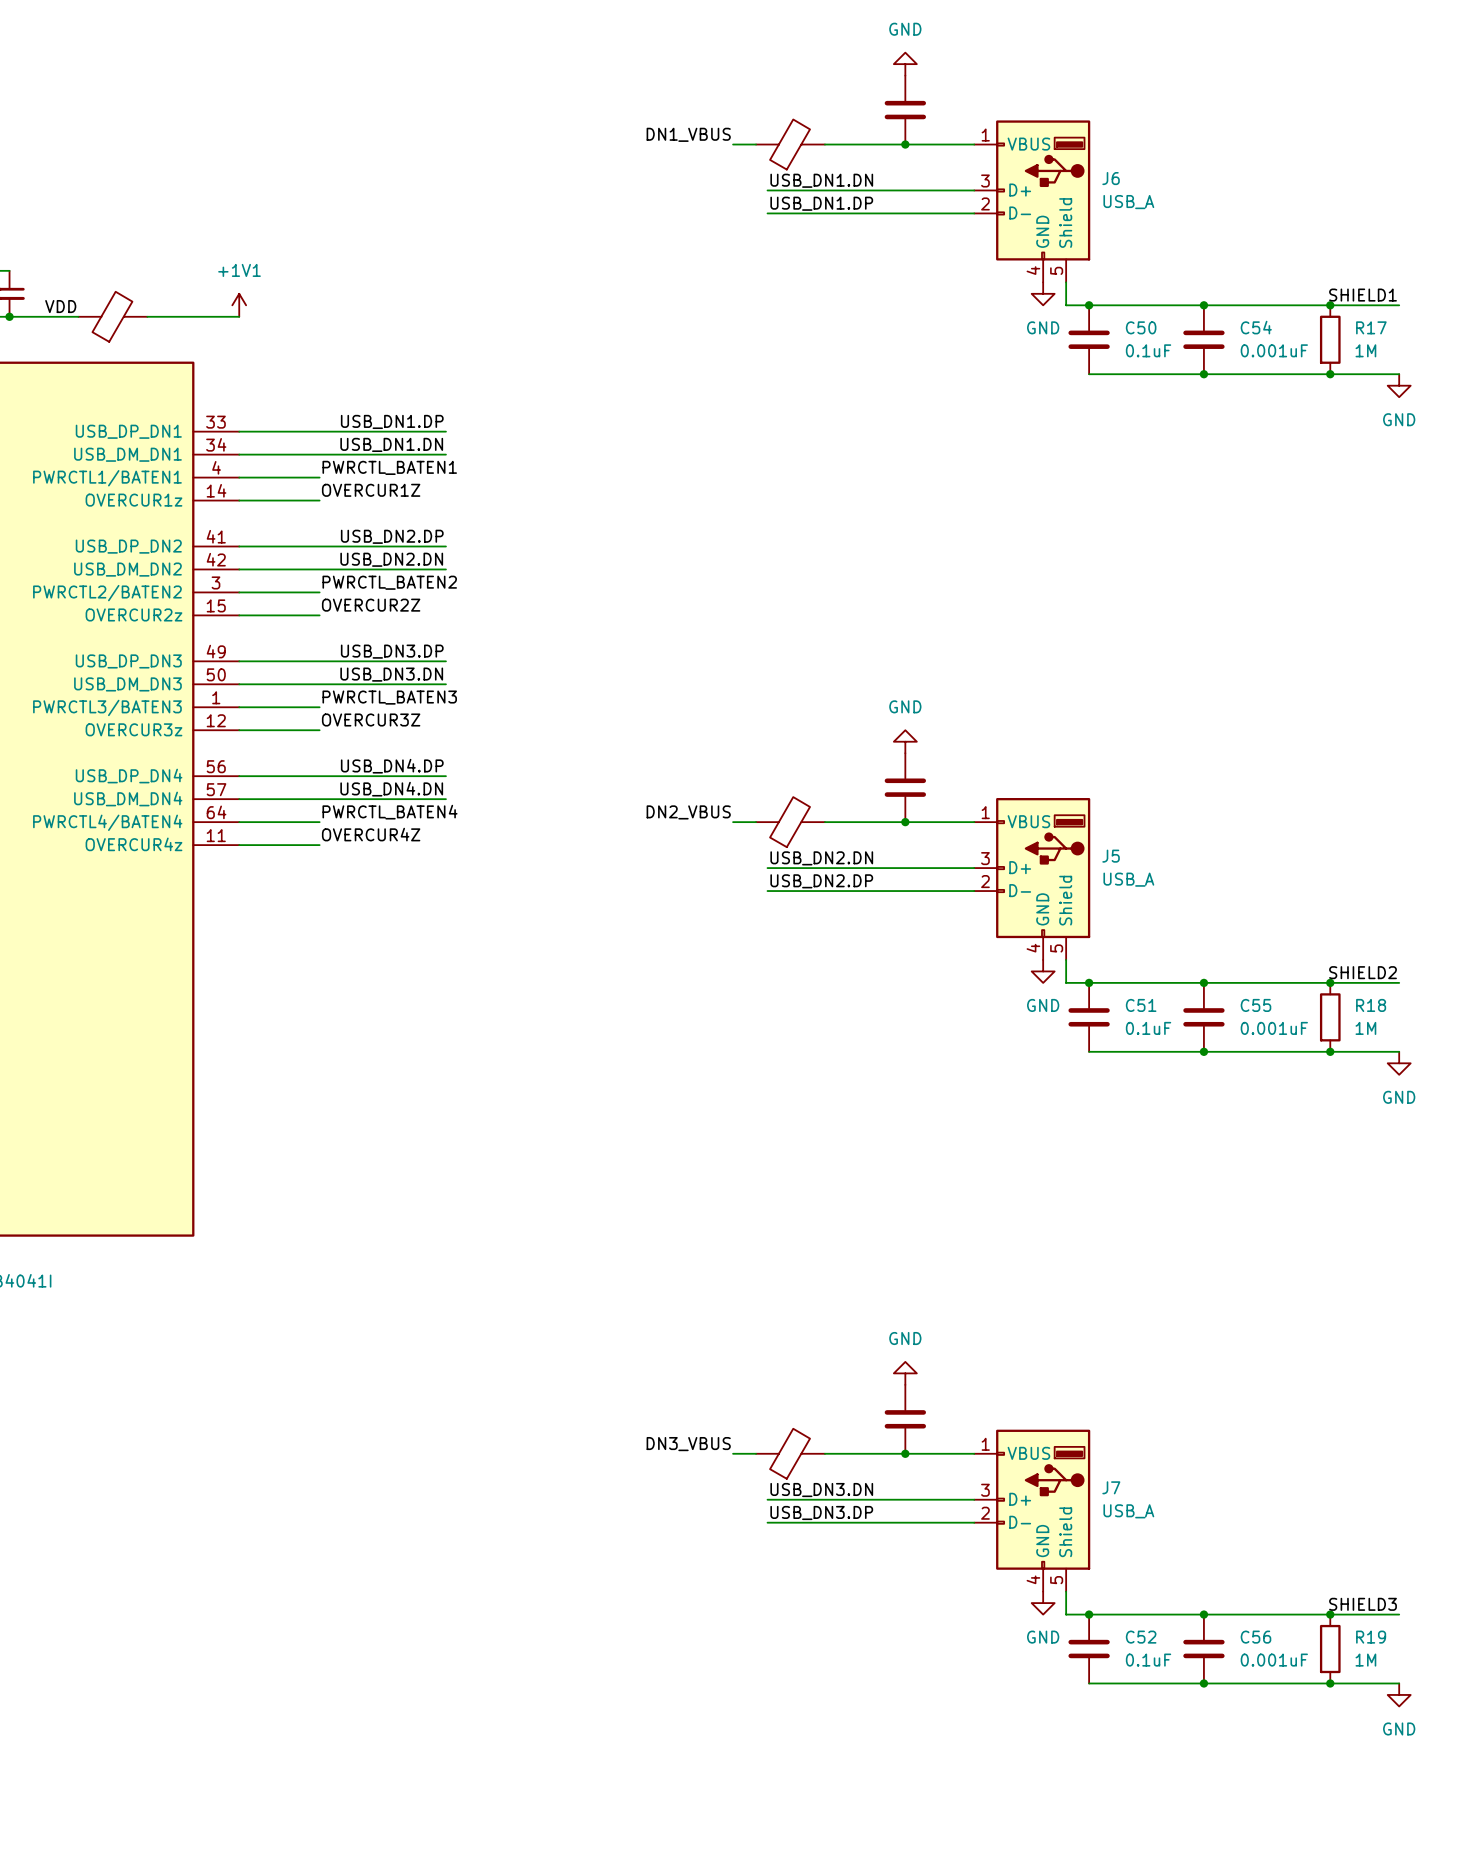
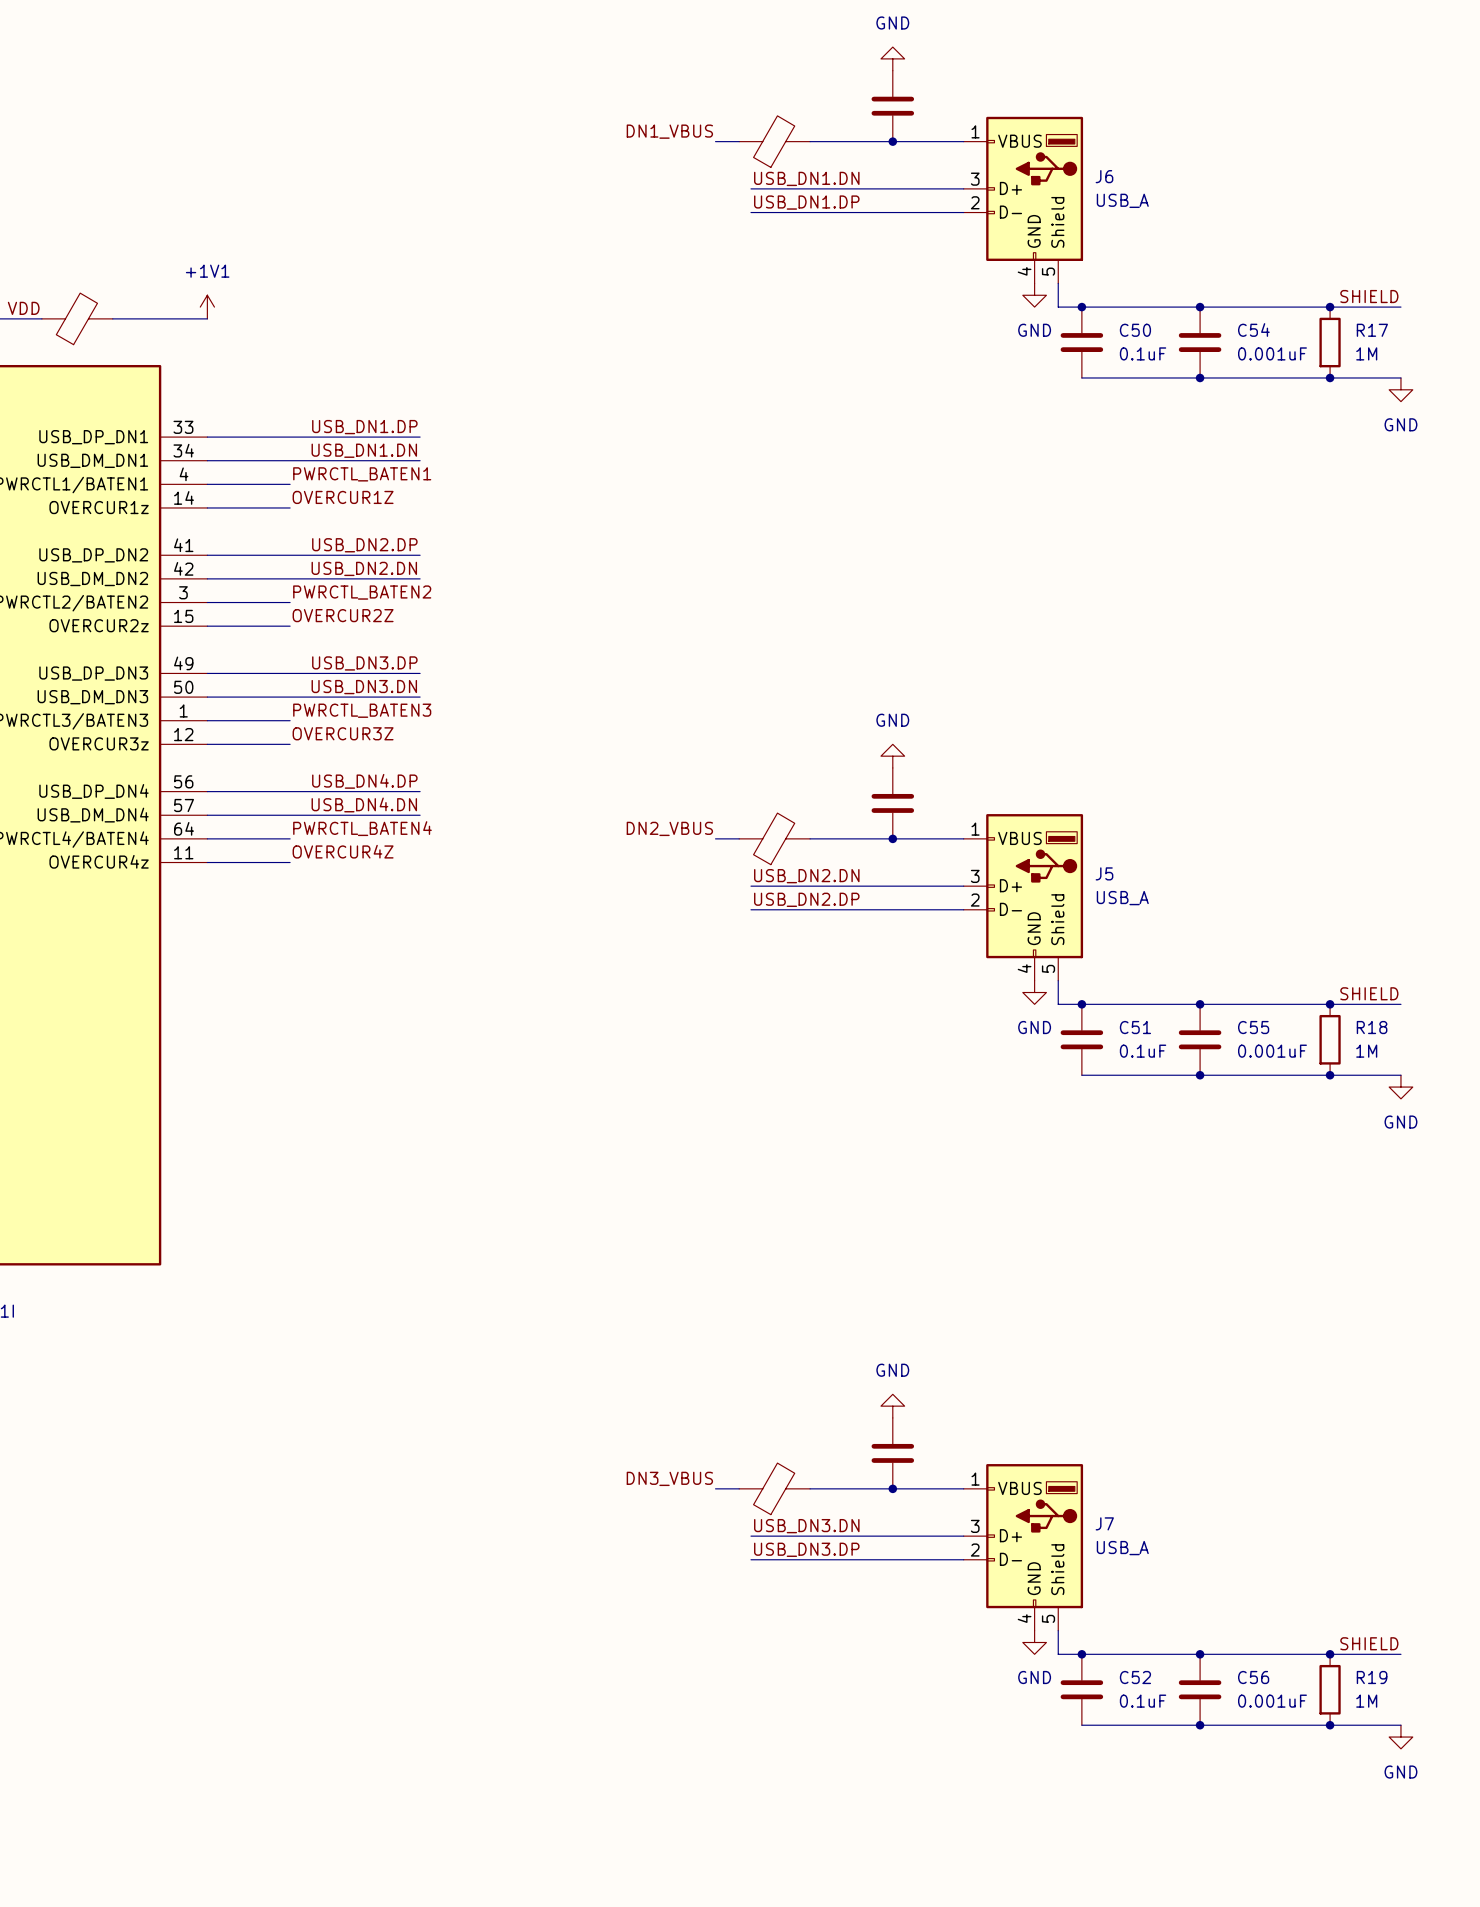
label: SHIELD1 (1363, 295) -> SHIELD (1369, 296)
label: SHIELD2 (1363, 972) -> SHIELD (1369, 993)
label: SHIELD3 (1363, 1604) -> SHIELD (1369, 1643)

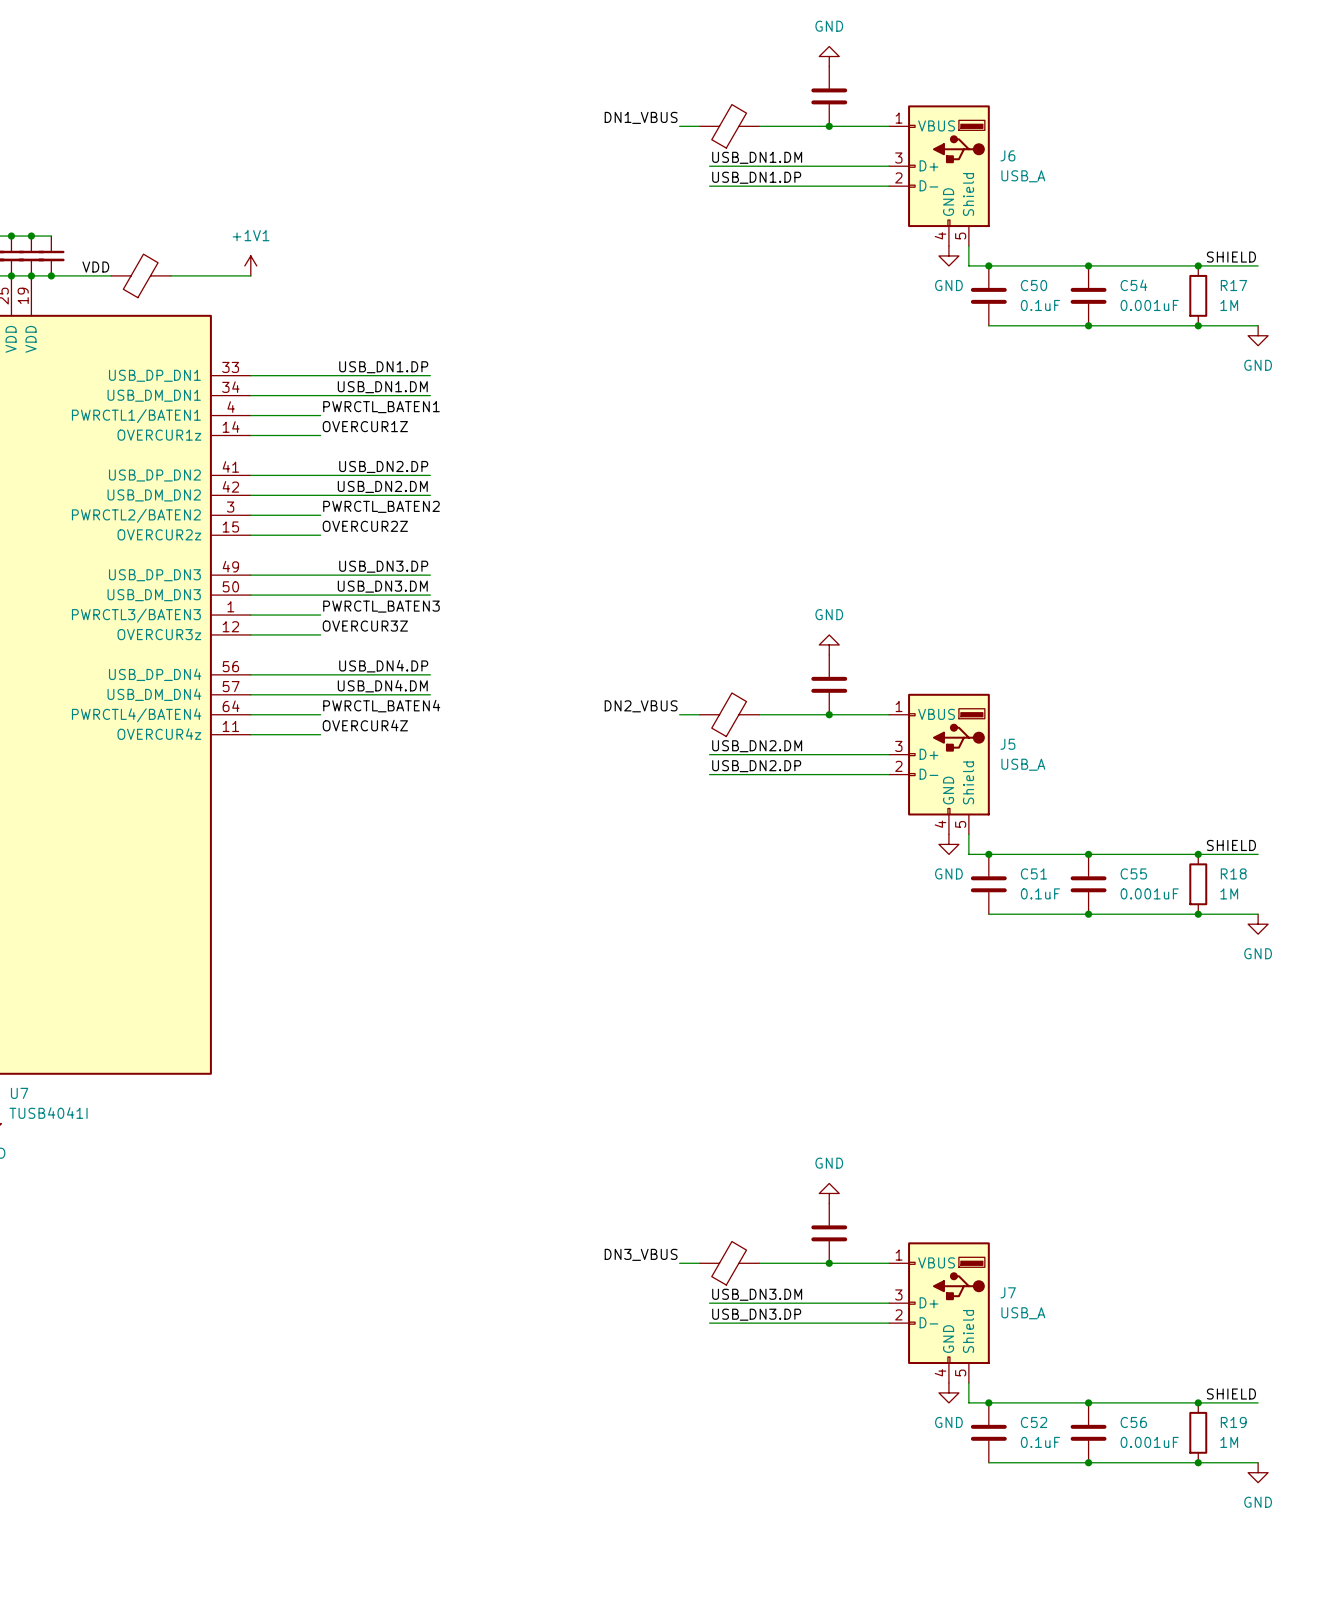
label: USB_DN1.DN (806, 178) -> USB_DN1.DM (757, 157)
label: USB_DN1.DN (364, 450) -> USB_DN1.DM (382, 387)
label: USB_DN2.DN (364, 568) -> USB_DN2.DM (382, 486)
label: USB_DN3.DN (364, 687) -> USB_DN3.DM (382, 586)
label: USB_DN4.DN (364, 804) -> USB_DN4.DM (382, 686)
label: USB_DN2.DN (806, 876) -> USB_DN2.DM (757, 746)
label: USB_DN3.DN (806, 1526) -> USB_DN3.DM (757, 1294)

